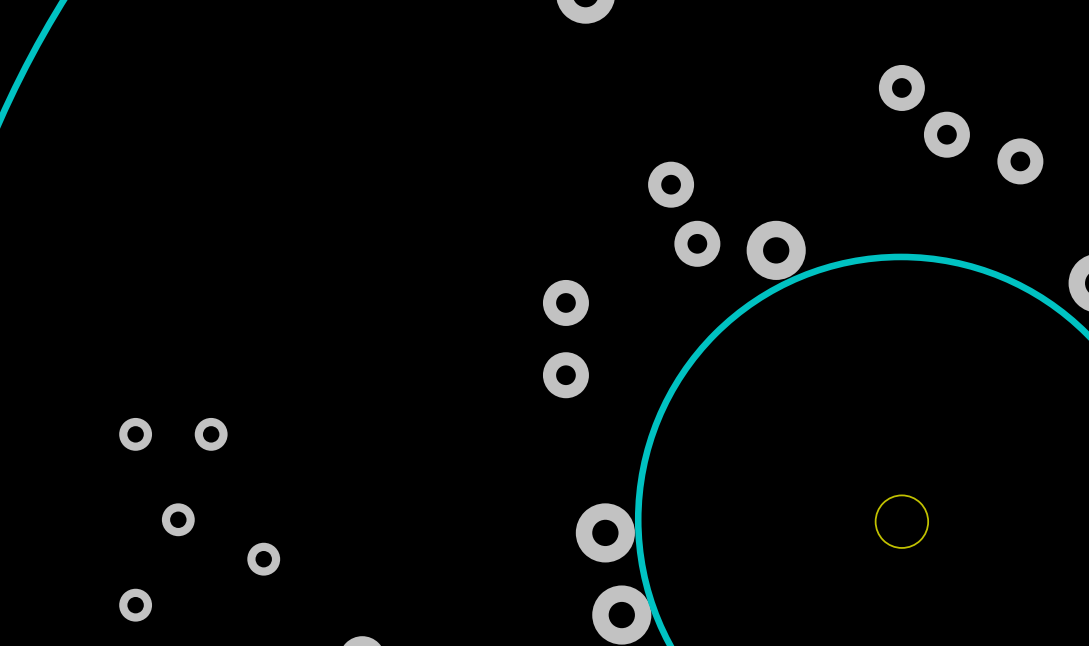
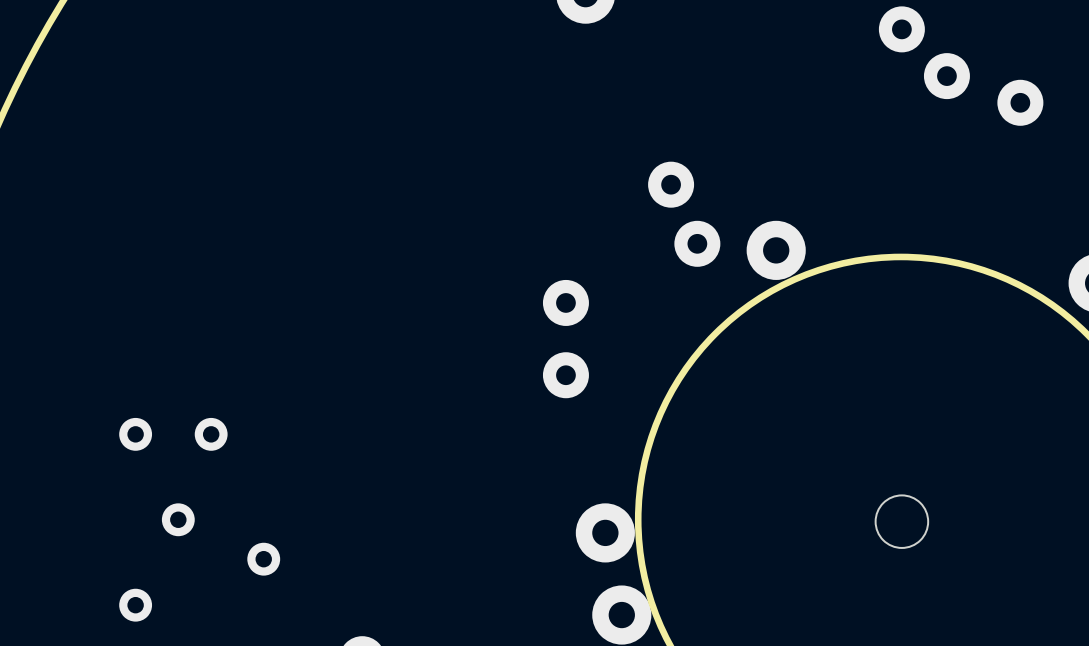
via: none -> (901, 29)
via position: (901, 87) -> (946, 76)
via: none -> (1020, 102)
via: (946, 134) -> none
via: (1020, 161) -> none

